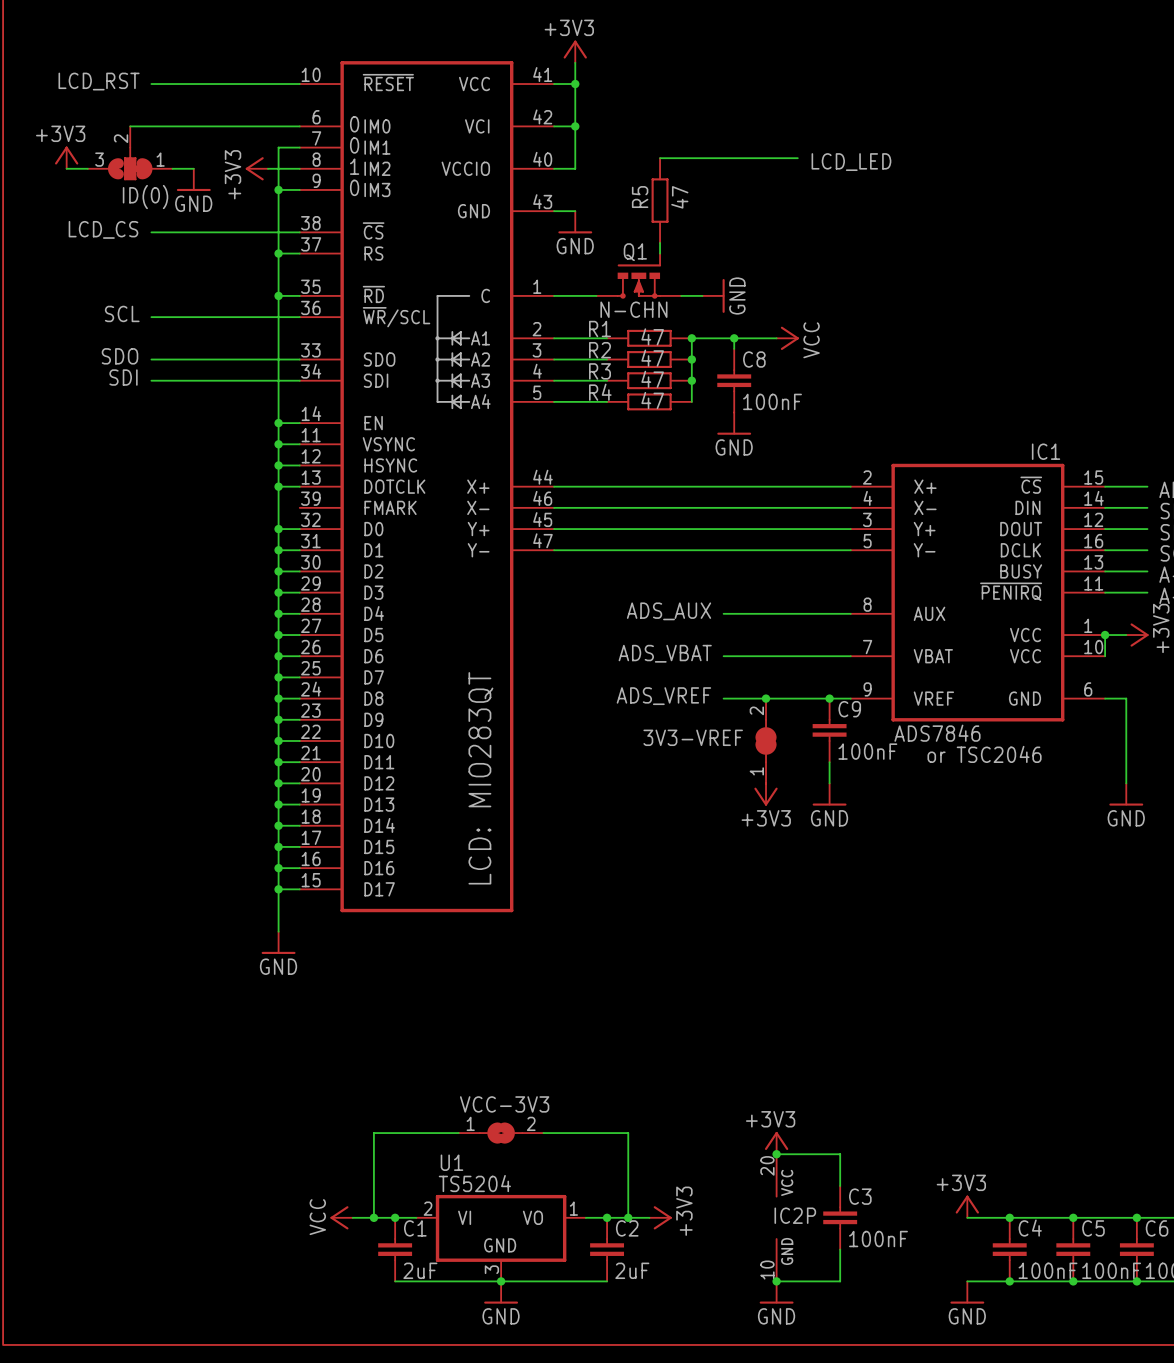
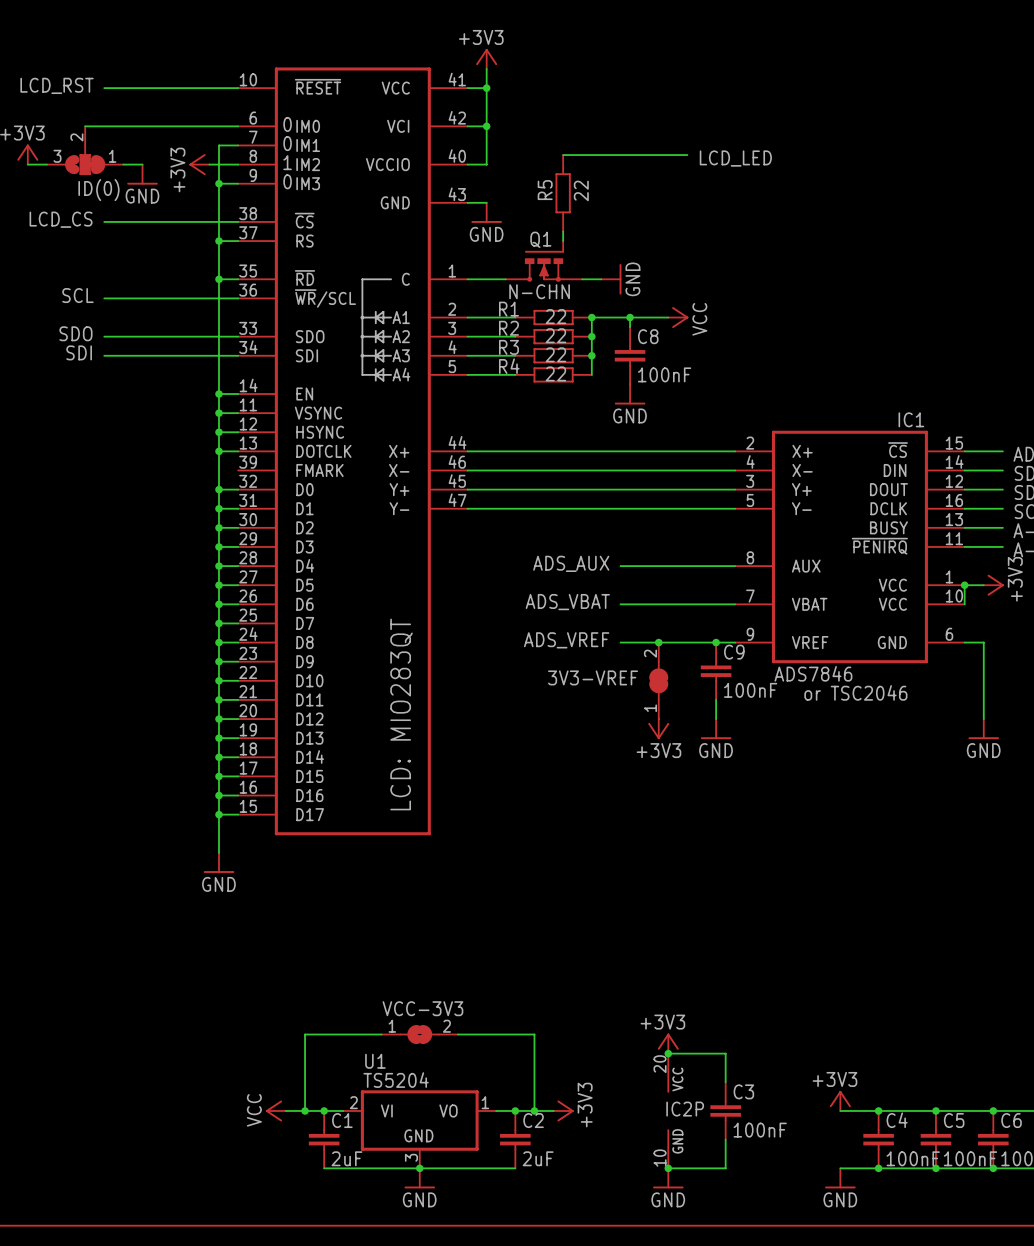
R5 value: 47 (679, 197) -> 22 (581, 190)
R1 value: 47 (652, 336) -> 22 (555, 316)
R2 value: 47 (652, 358) -> 22 (555, 335)
R3 value: 47 (652, 379) -> 22 (555, 354)
R4 value: 47 (652, 400) -> 22 (555, 373)

